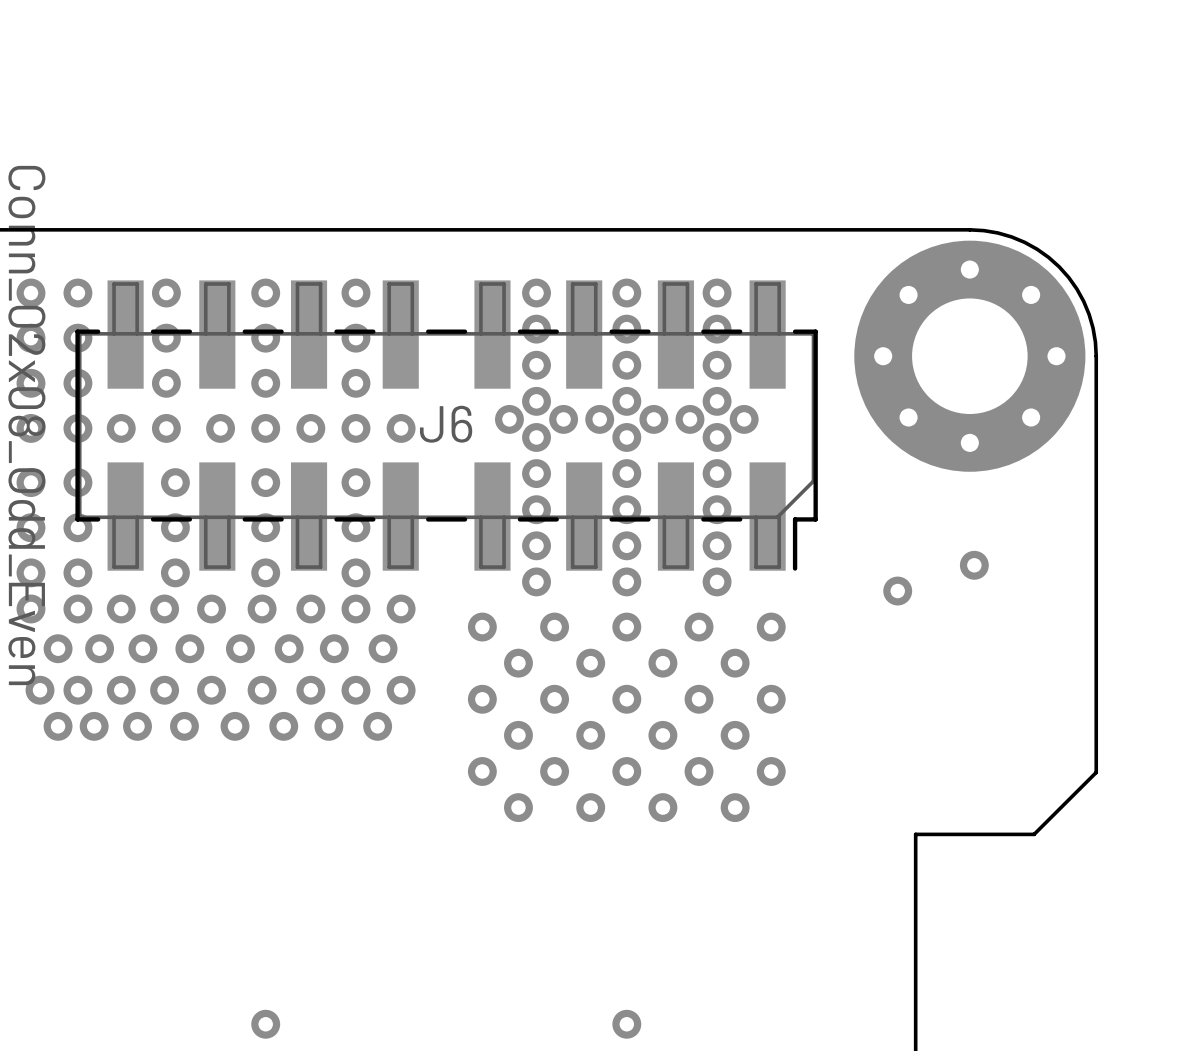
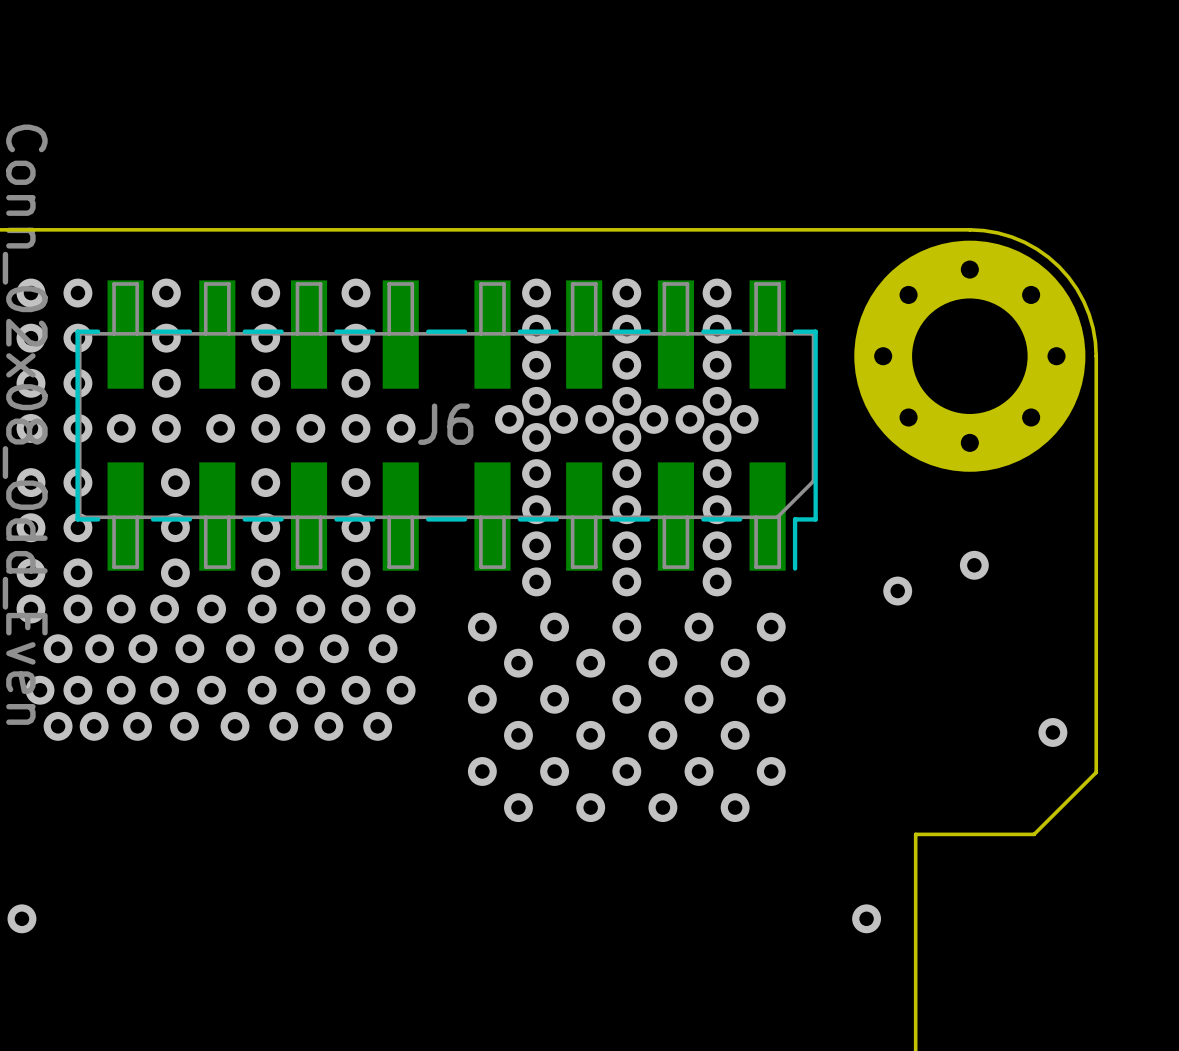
via: none -> (1052, 732)
via: none -> (21, 918)
via: none -> (866, 918)
via: (265, 1024) -> none
via: (626, 1024) -> none

